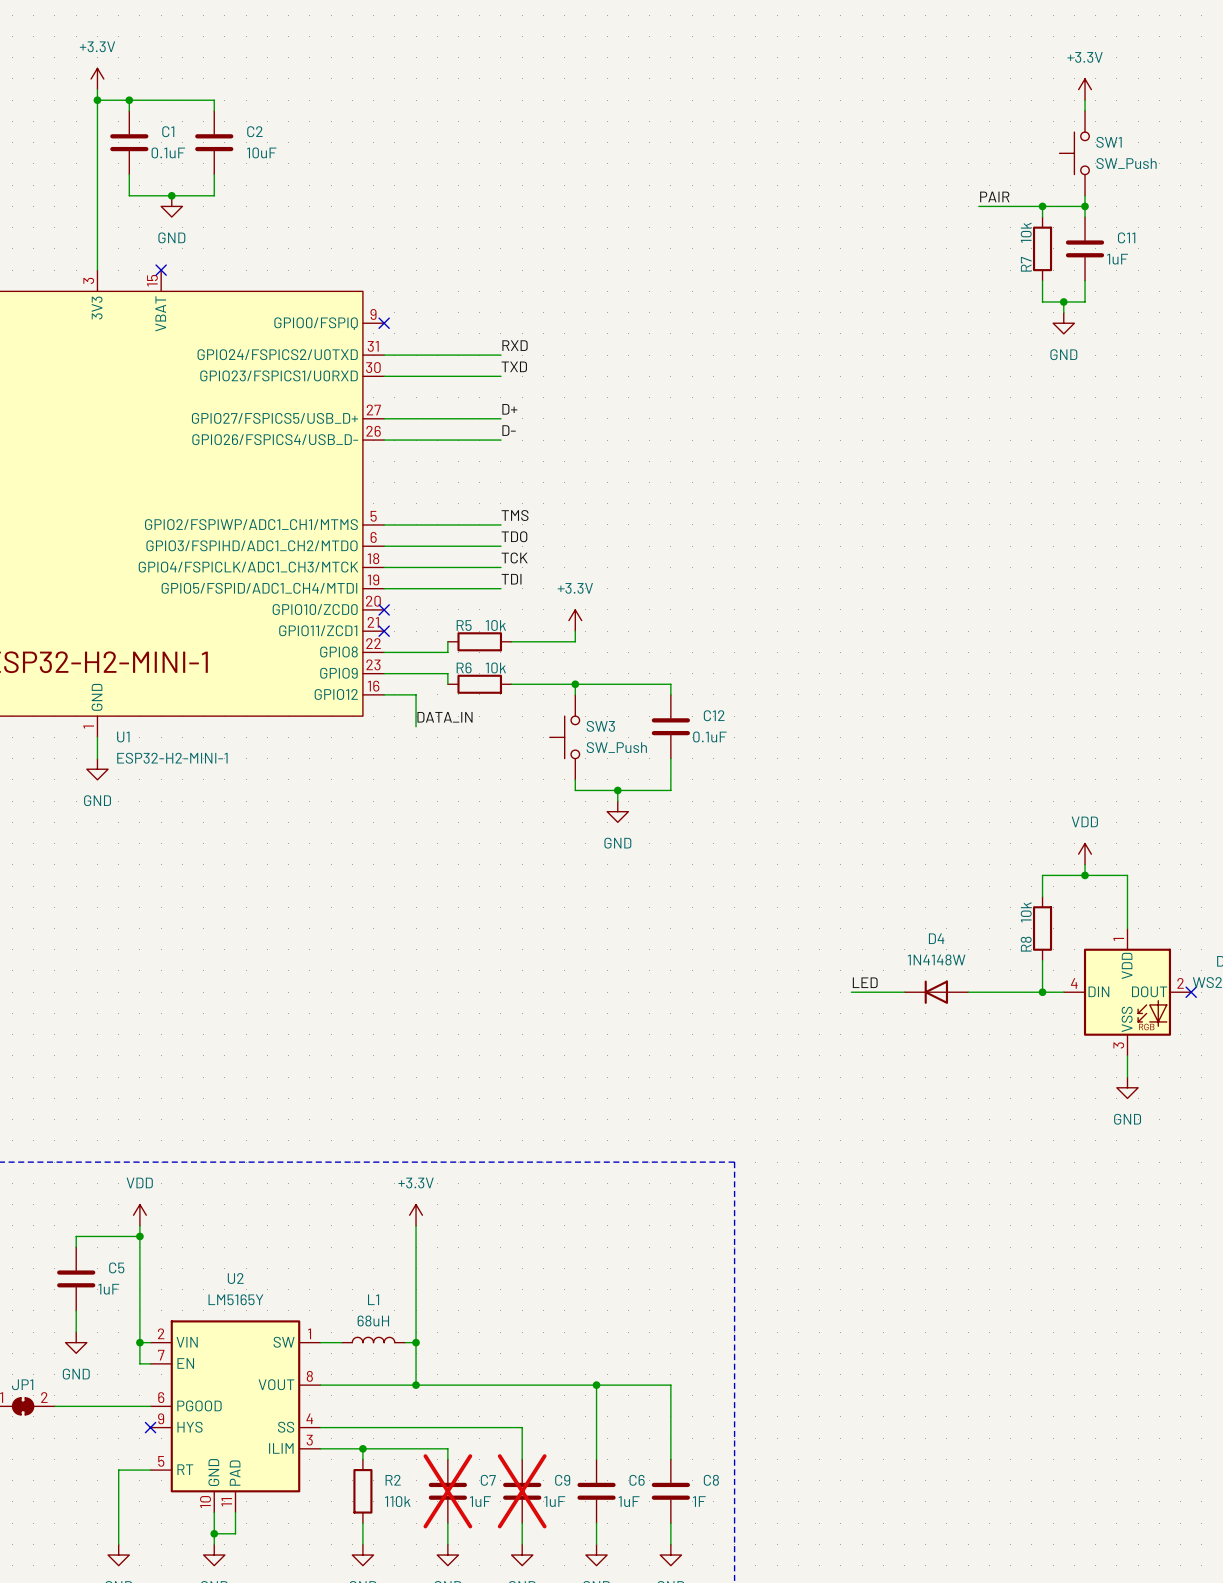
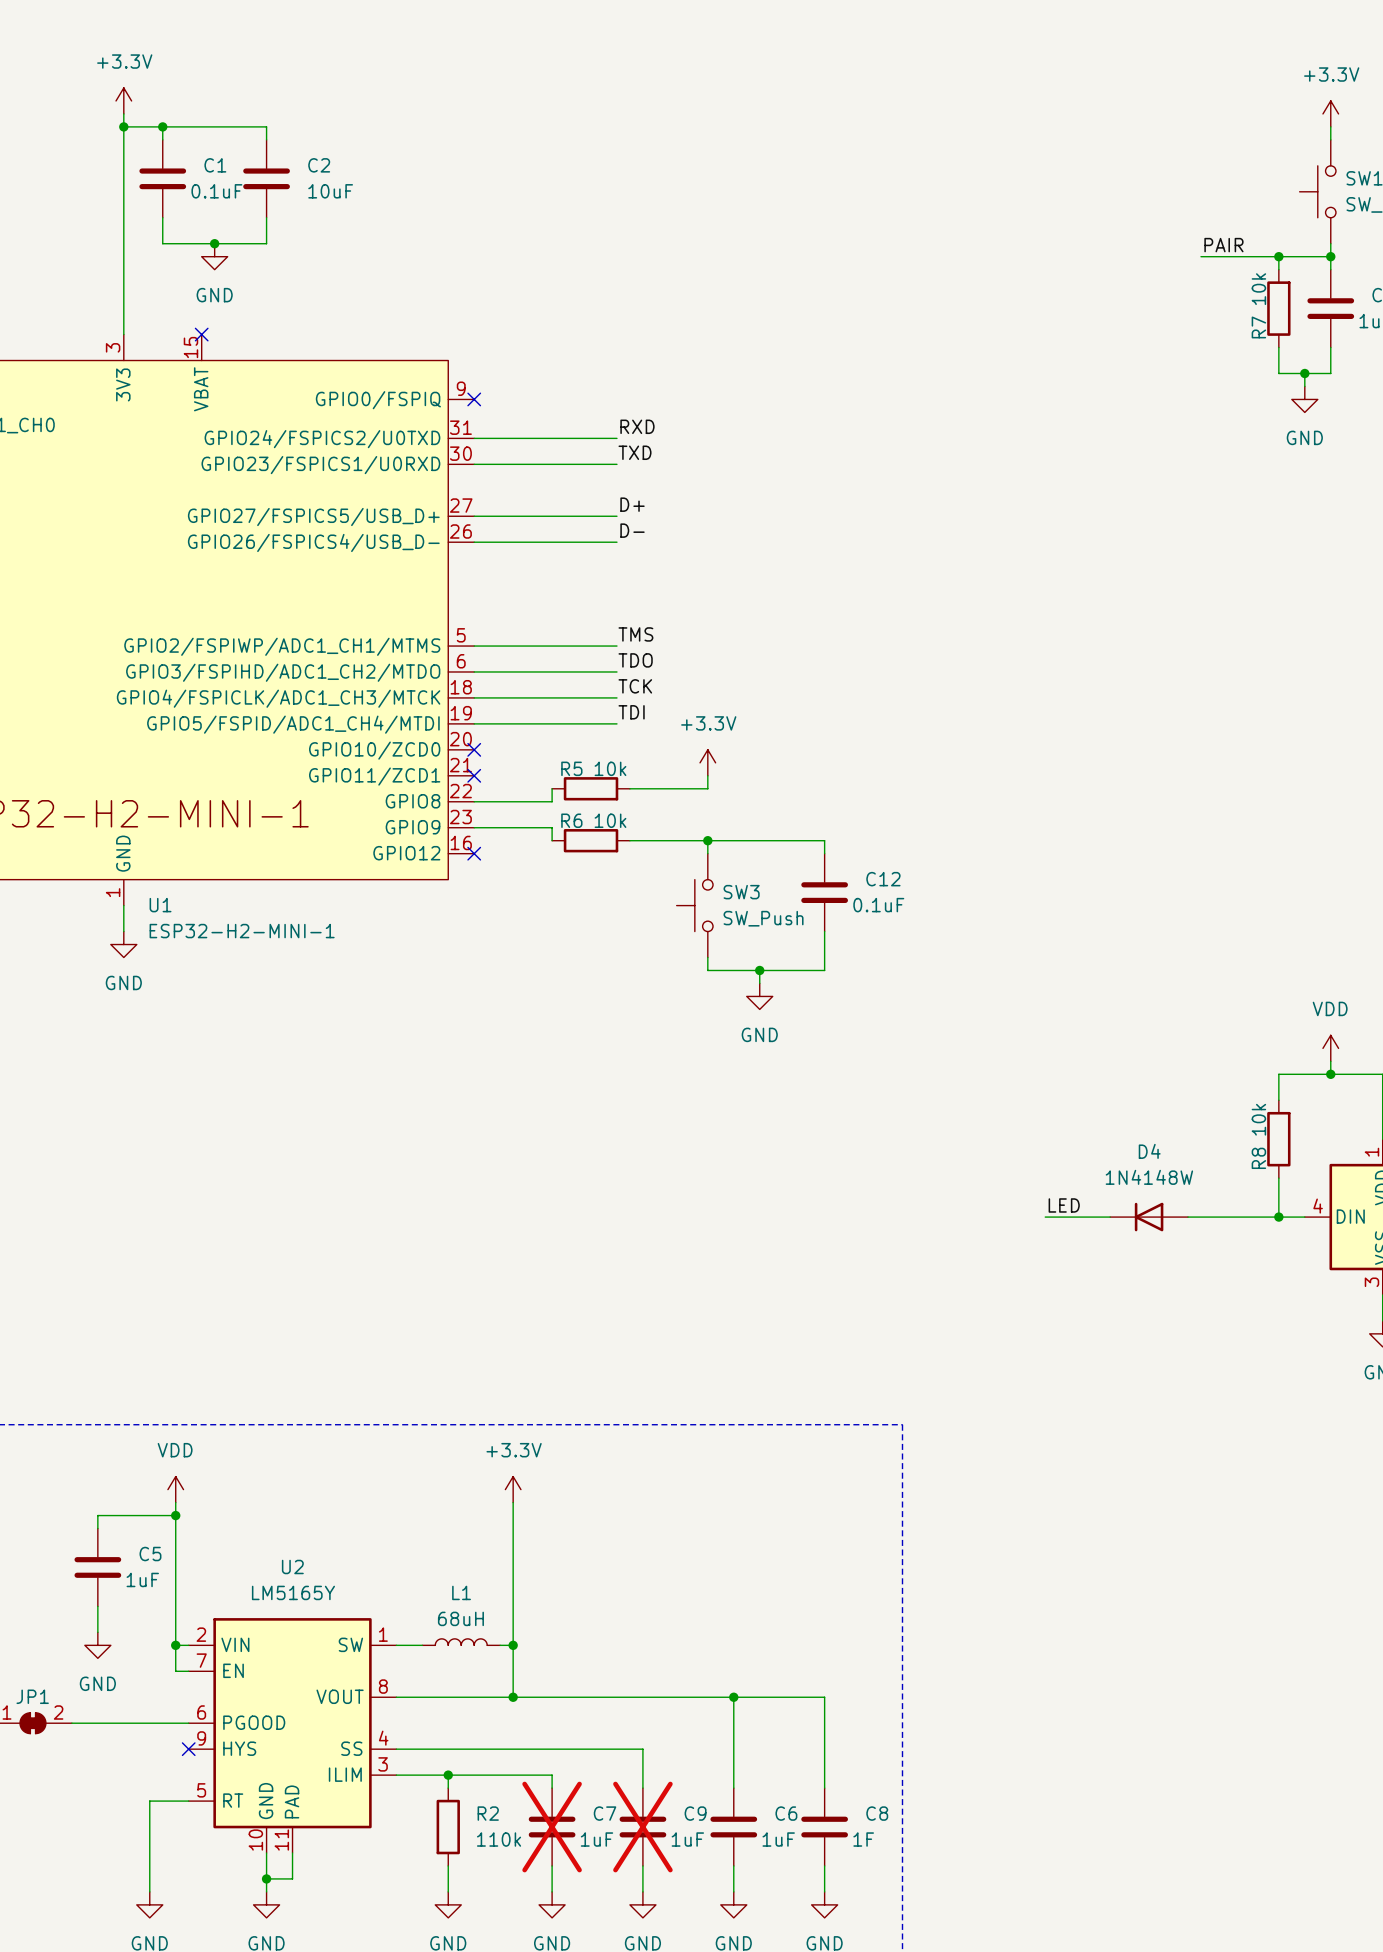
wire: (384, 694) (416, 694) (416, 726) -> none
no-connect mark: none -> (474, 853)
label: DATA_IN (444, 717) -> none

